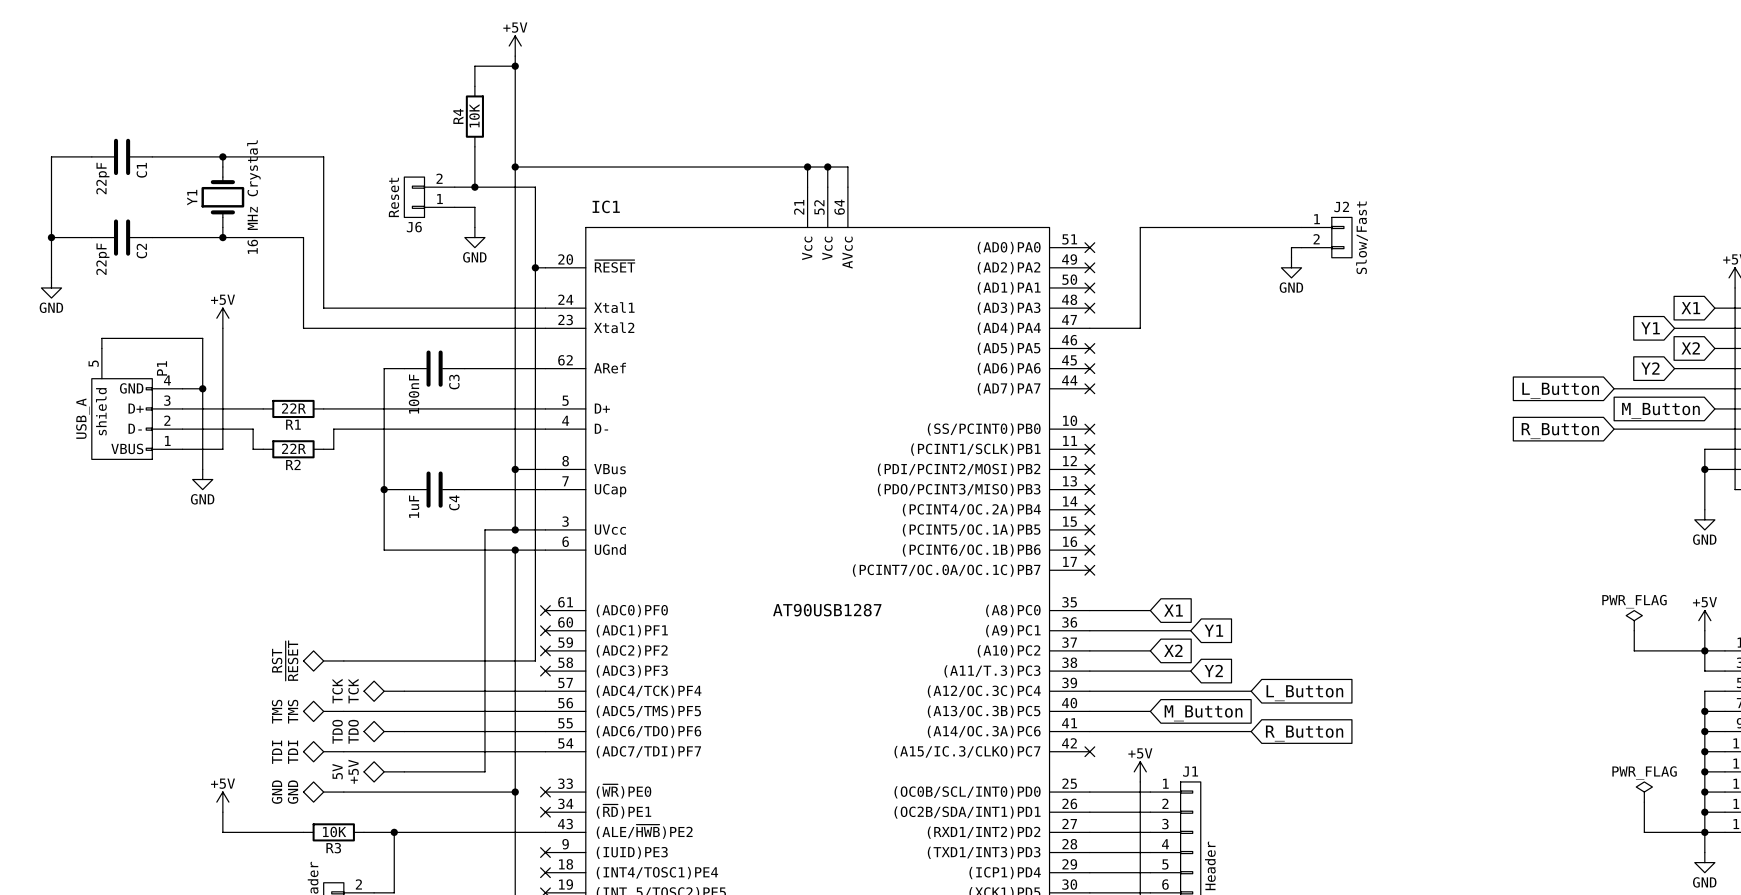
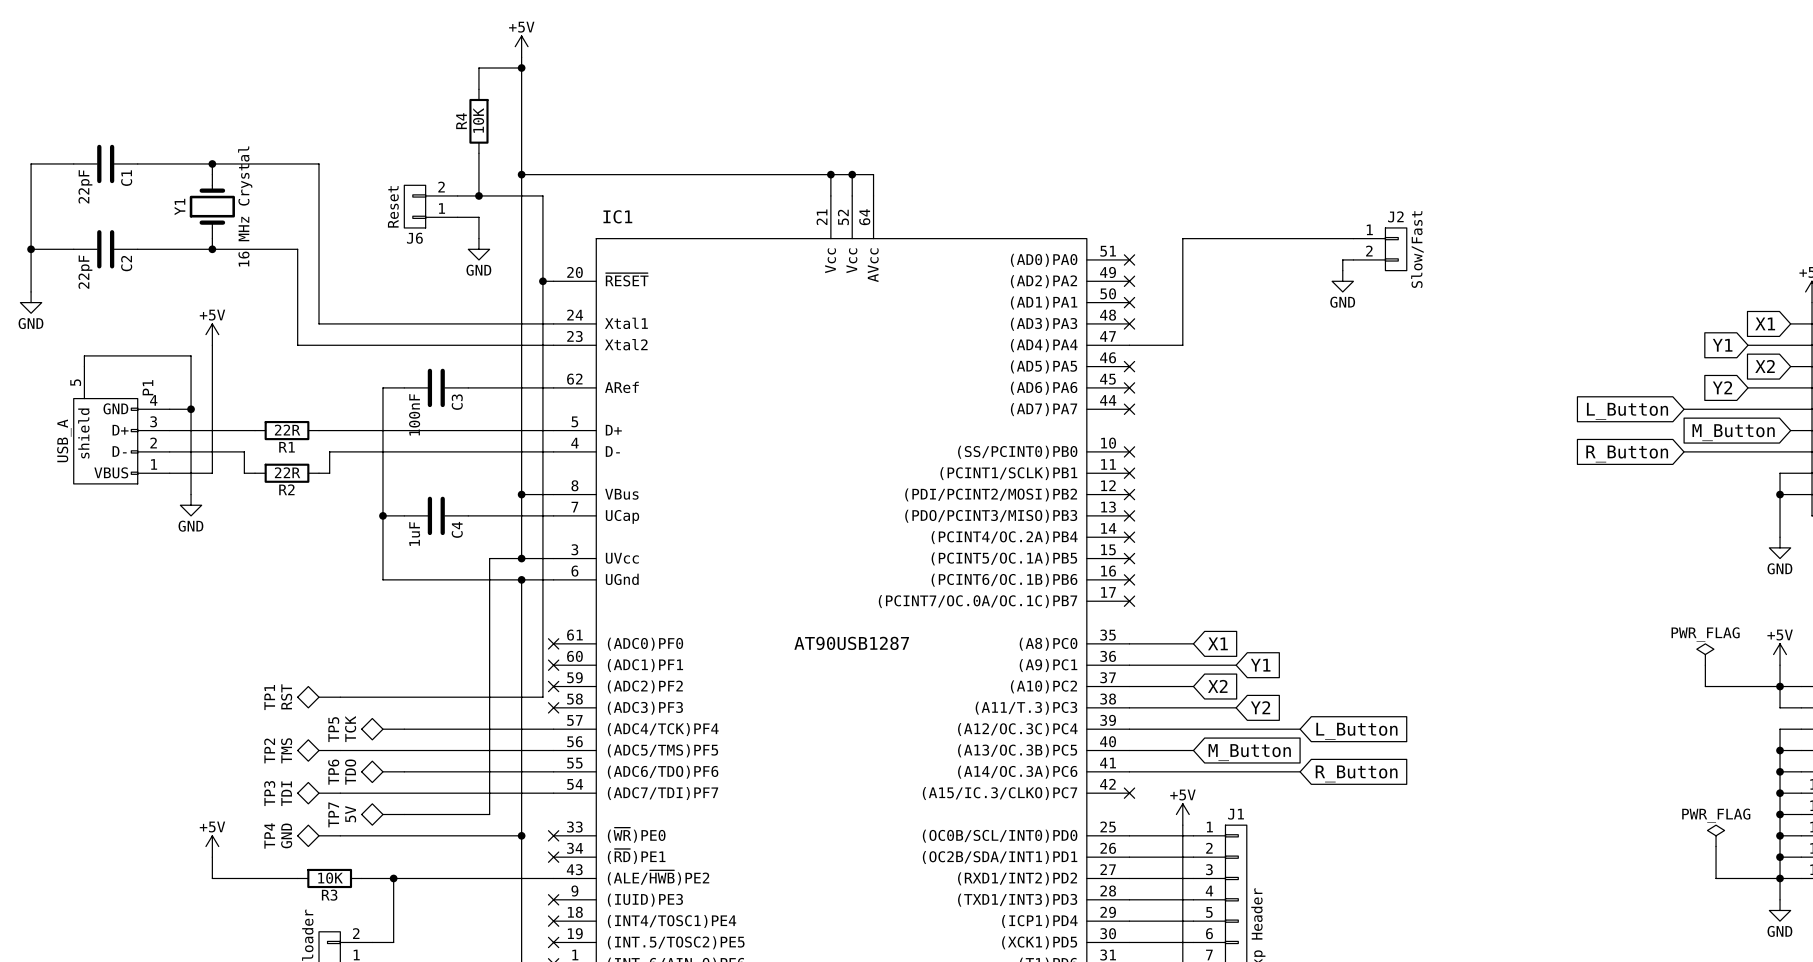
RST name: RST (277, 660) -> TP1 (269, 697)
RST value: ~{RESET} (292, 660) -> RST (286, 696)
TCK name: TCK (337, 691) -> TP5 (333, 729)
TMS name: TMS (277, 711) -> TP2 (269, 750)
TDO name: TDO (337, 731) -> TP6 (333, 772)
TDI name: TDI (277, 752) -> TP3 (269, 793)
5V name: 5V (337, 771) -> TP7 (333, 814)
5V value: +5V (353, 771) -> 5V (350, 814)
GND name: GND (277, 792) -> TP4 (269, 836)

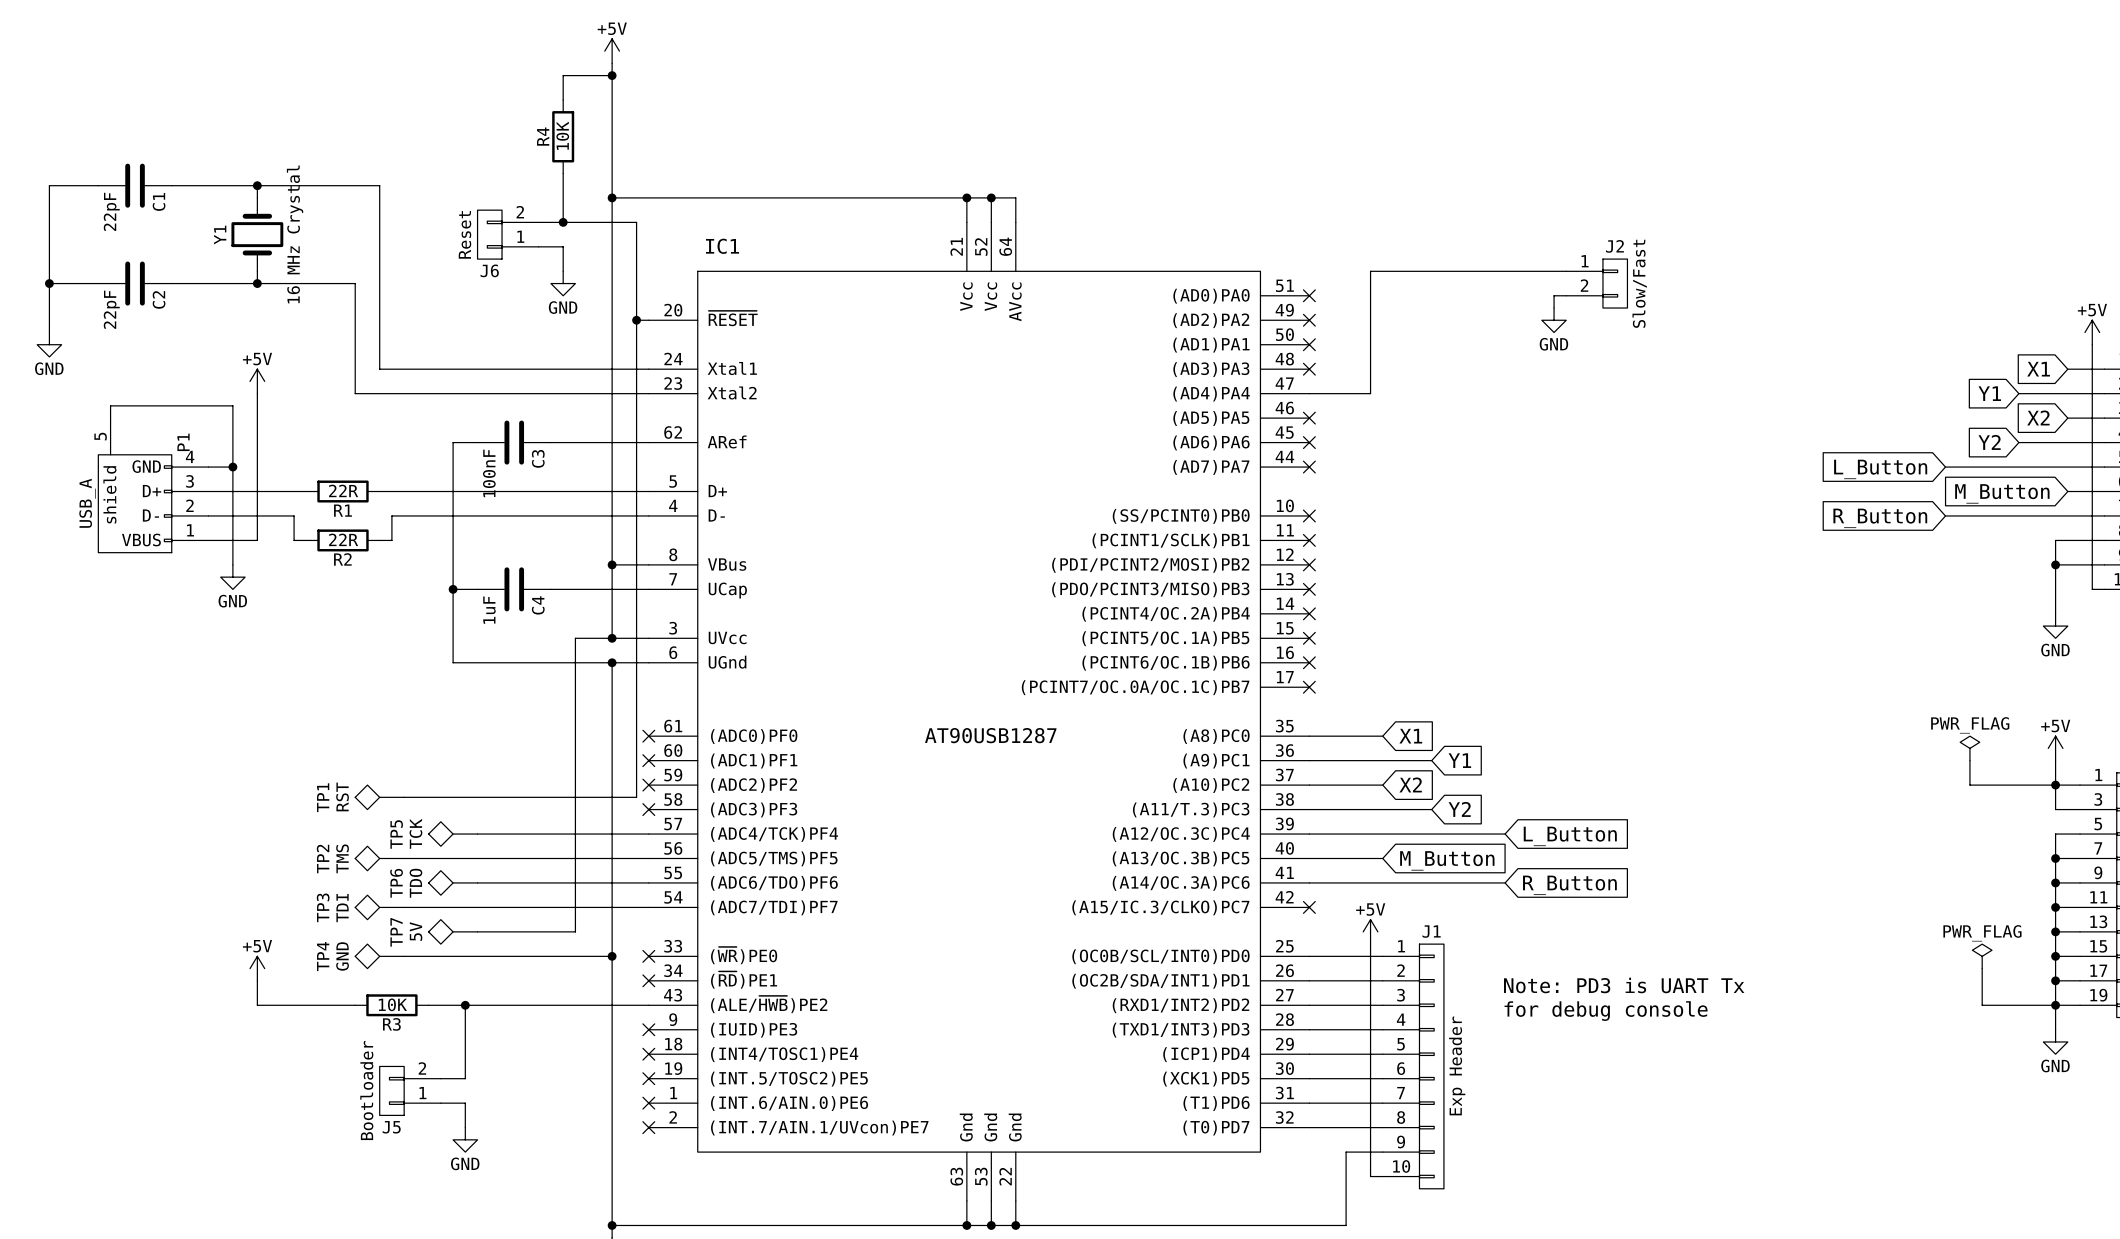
text: none -> Note: PD3 is UART Tx (1624, 985)
text: none -> for debug console (1606, 1011)

